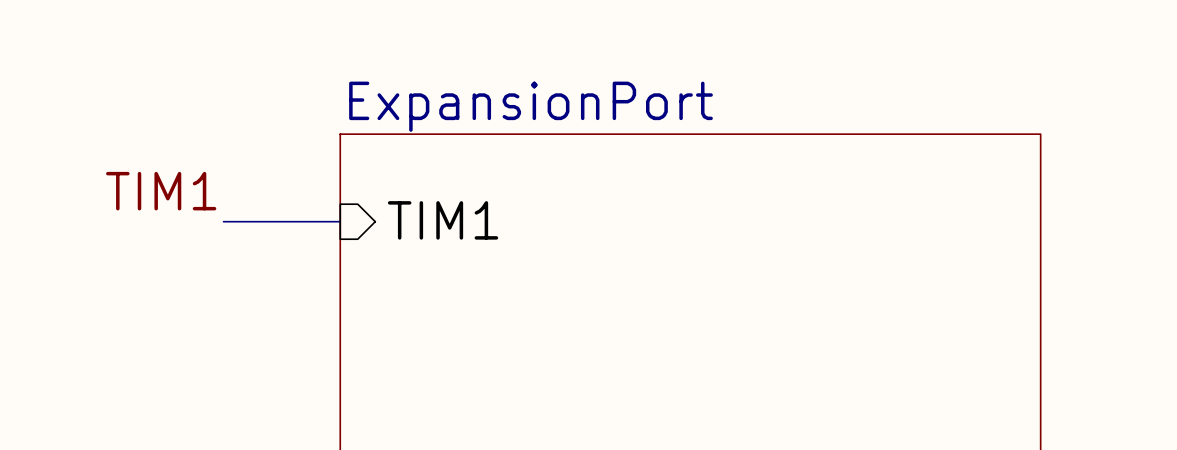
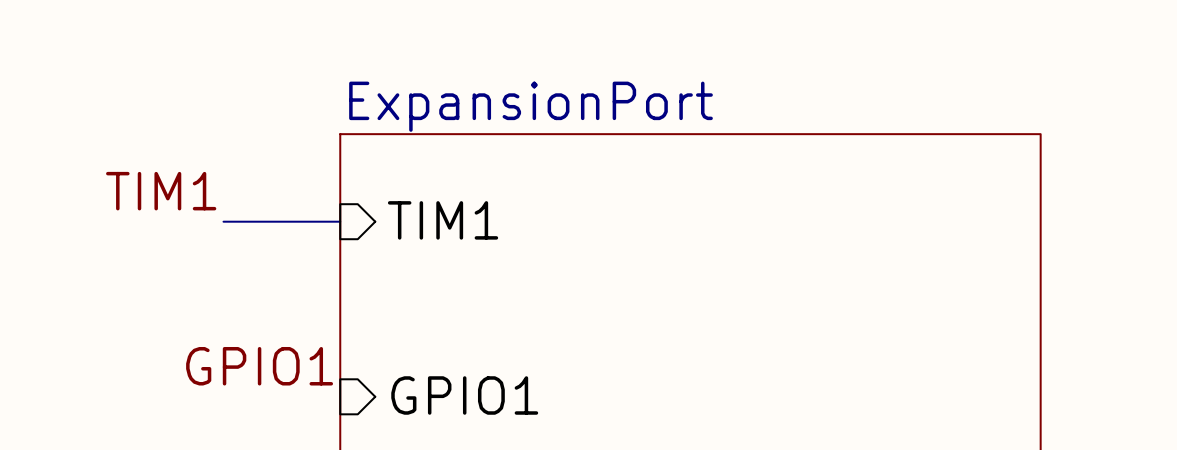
label: none -> GPIO1 (259, 366)
sheet pin: none -> GPIO1 (464, 395)

